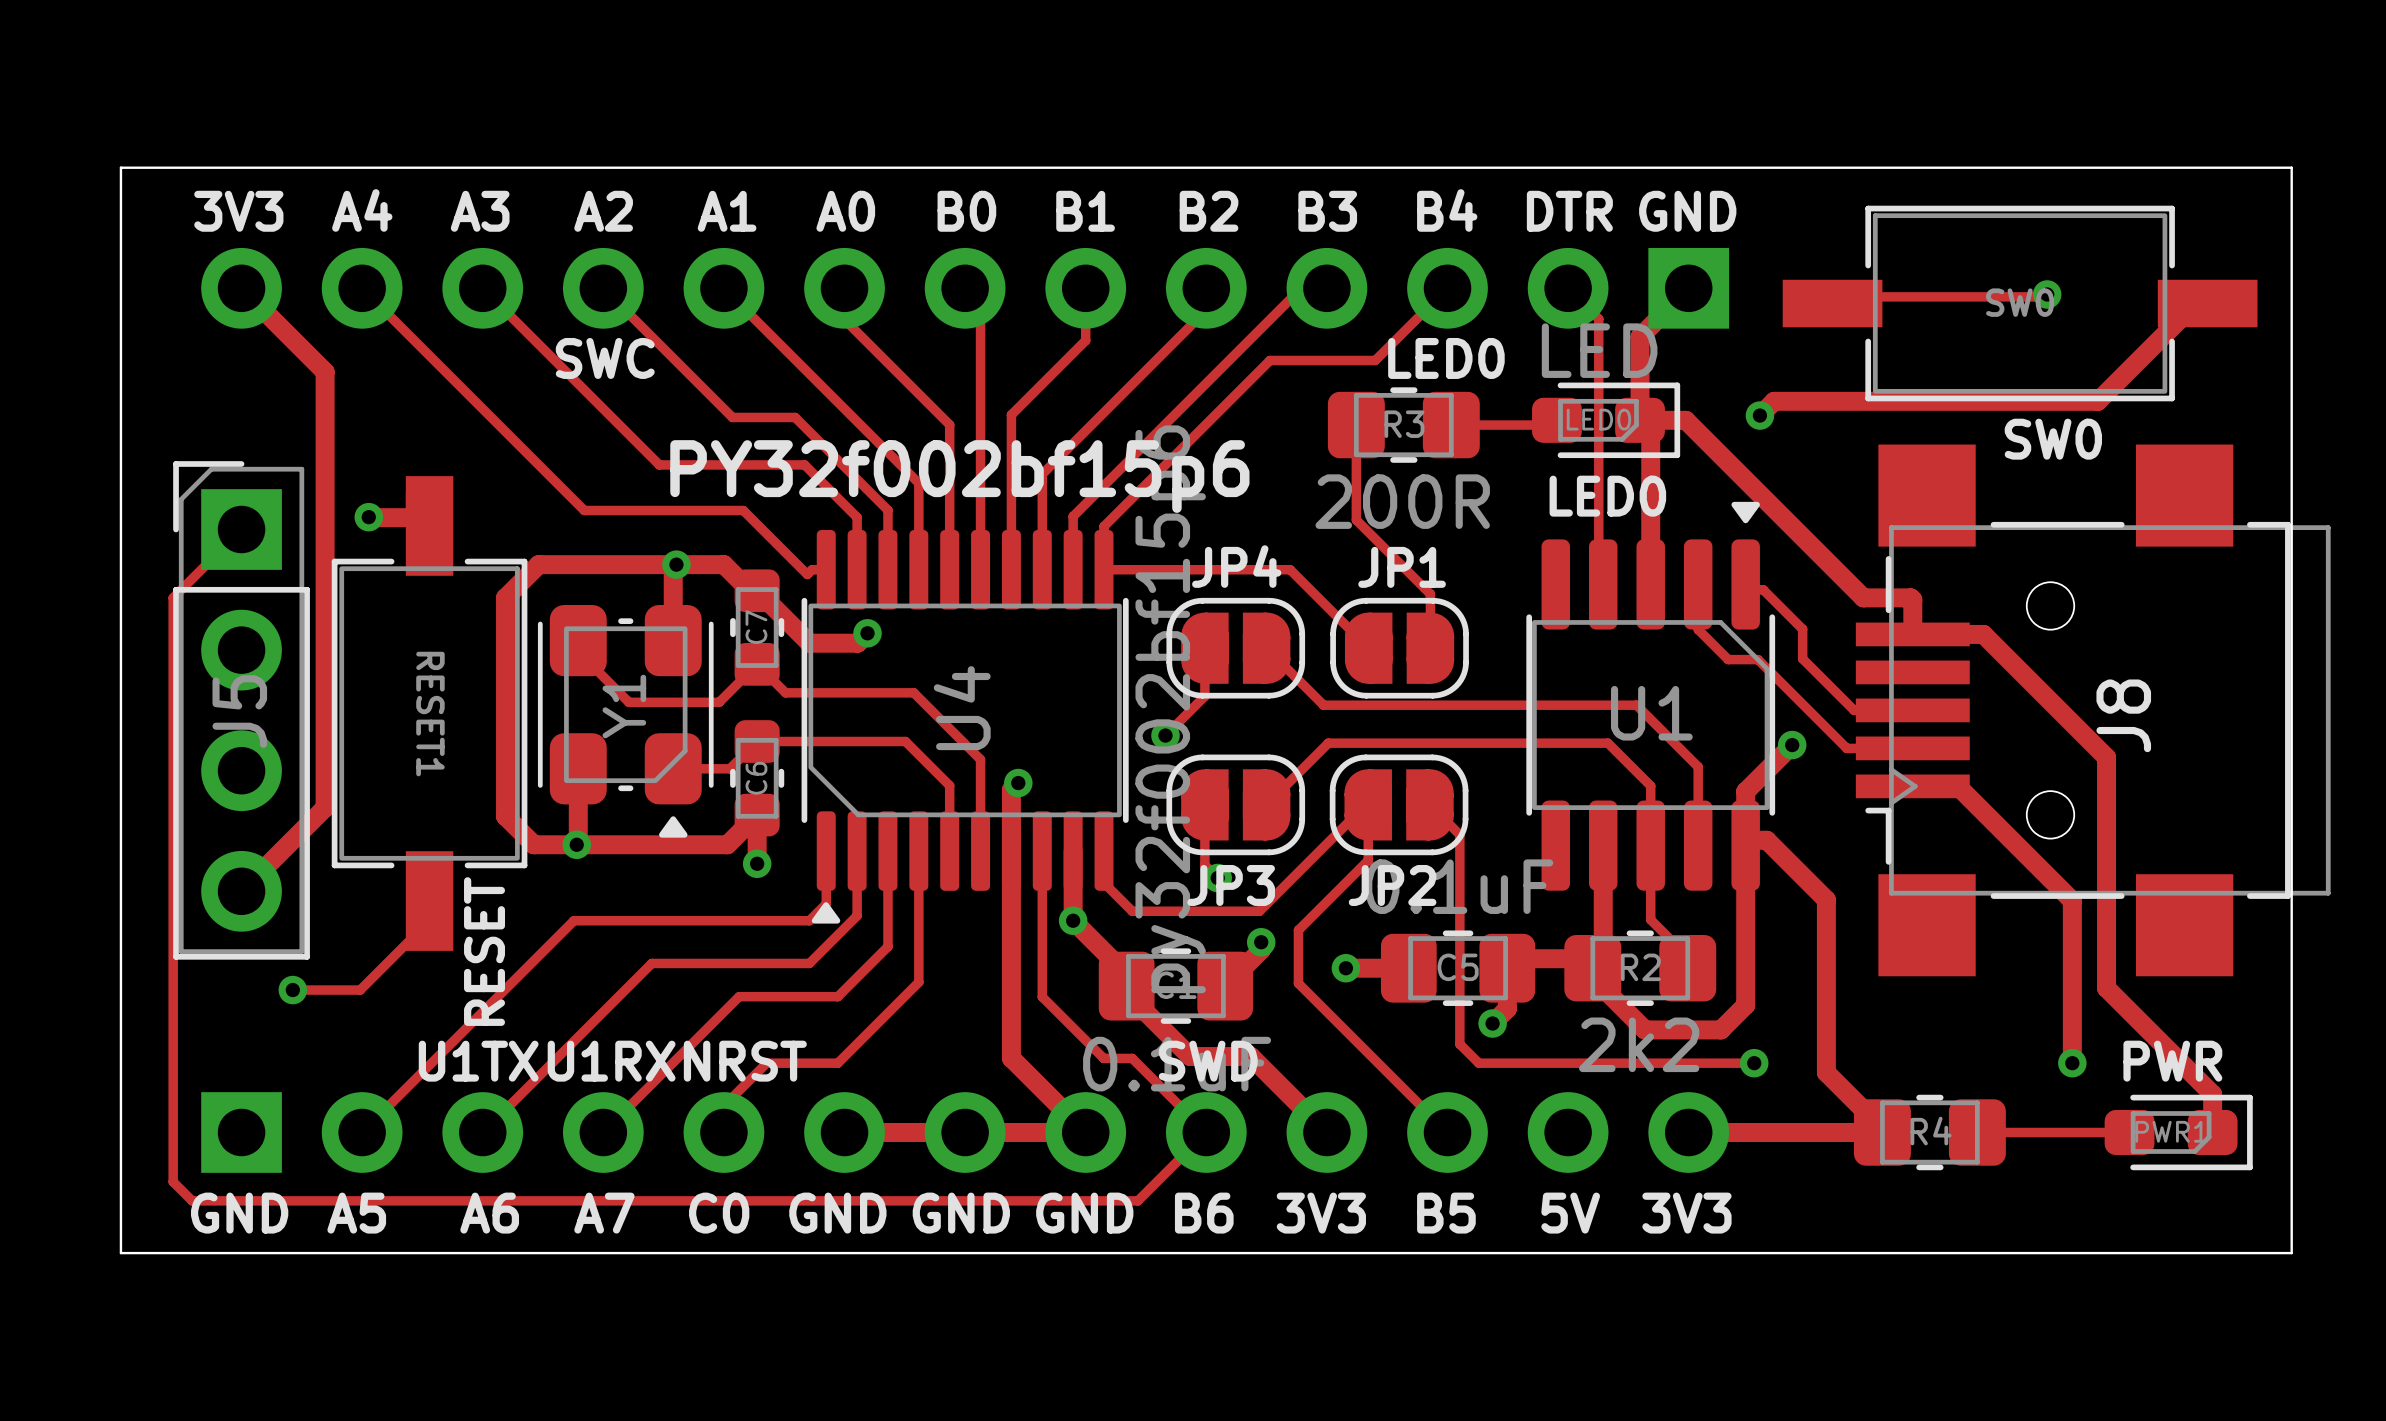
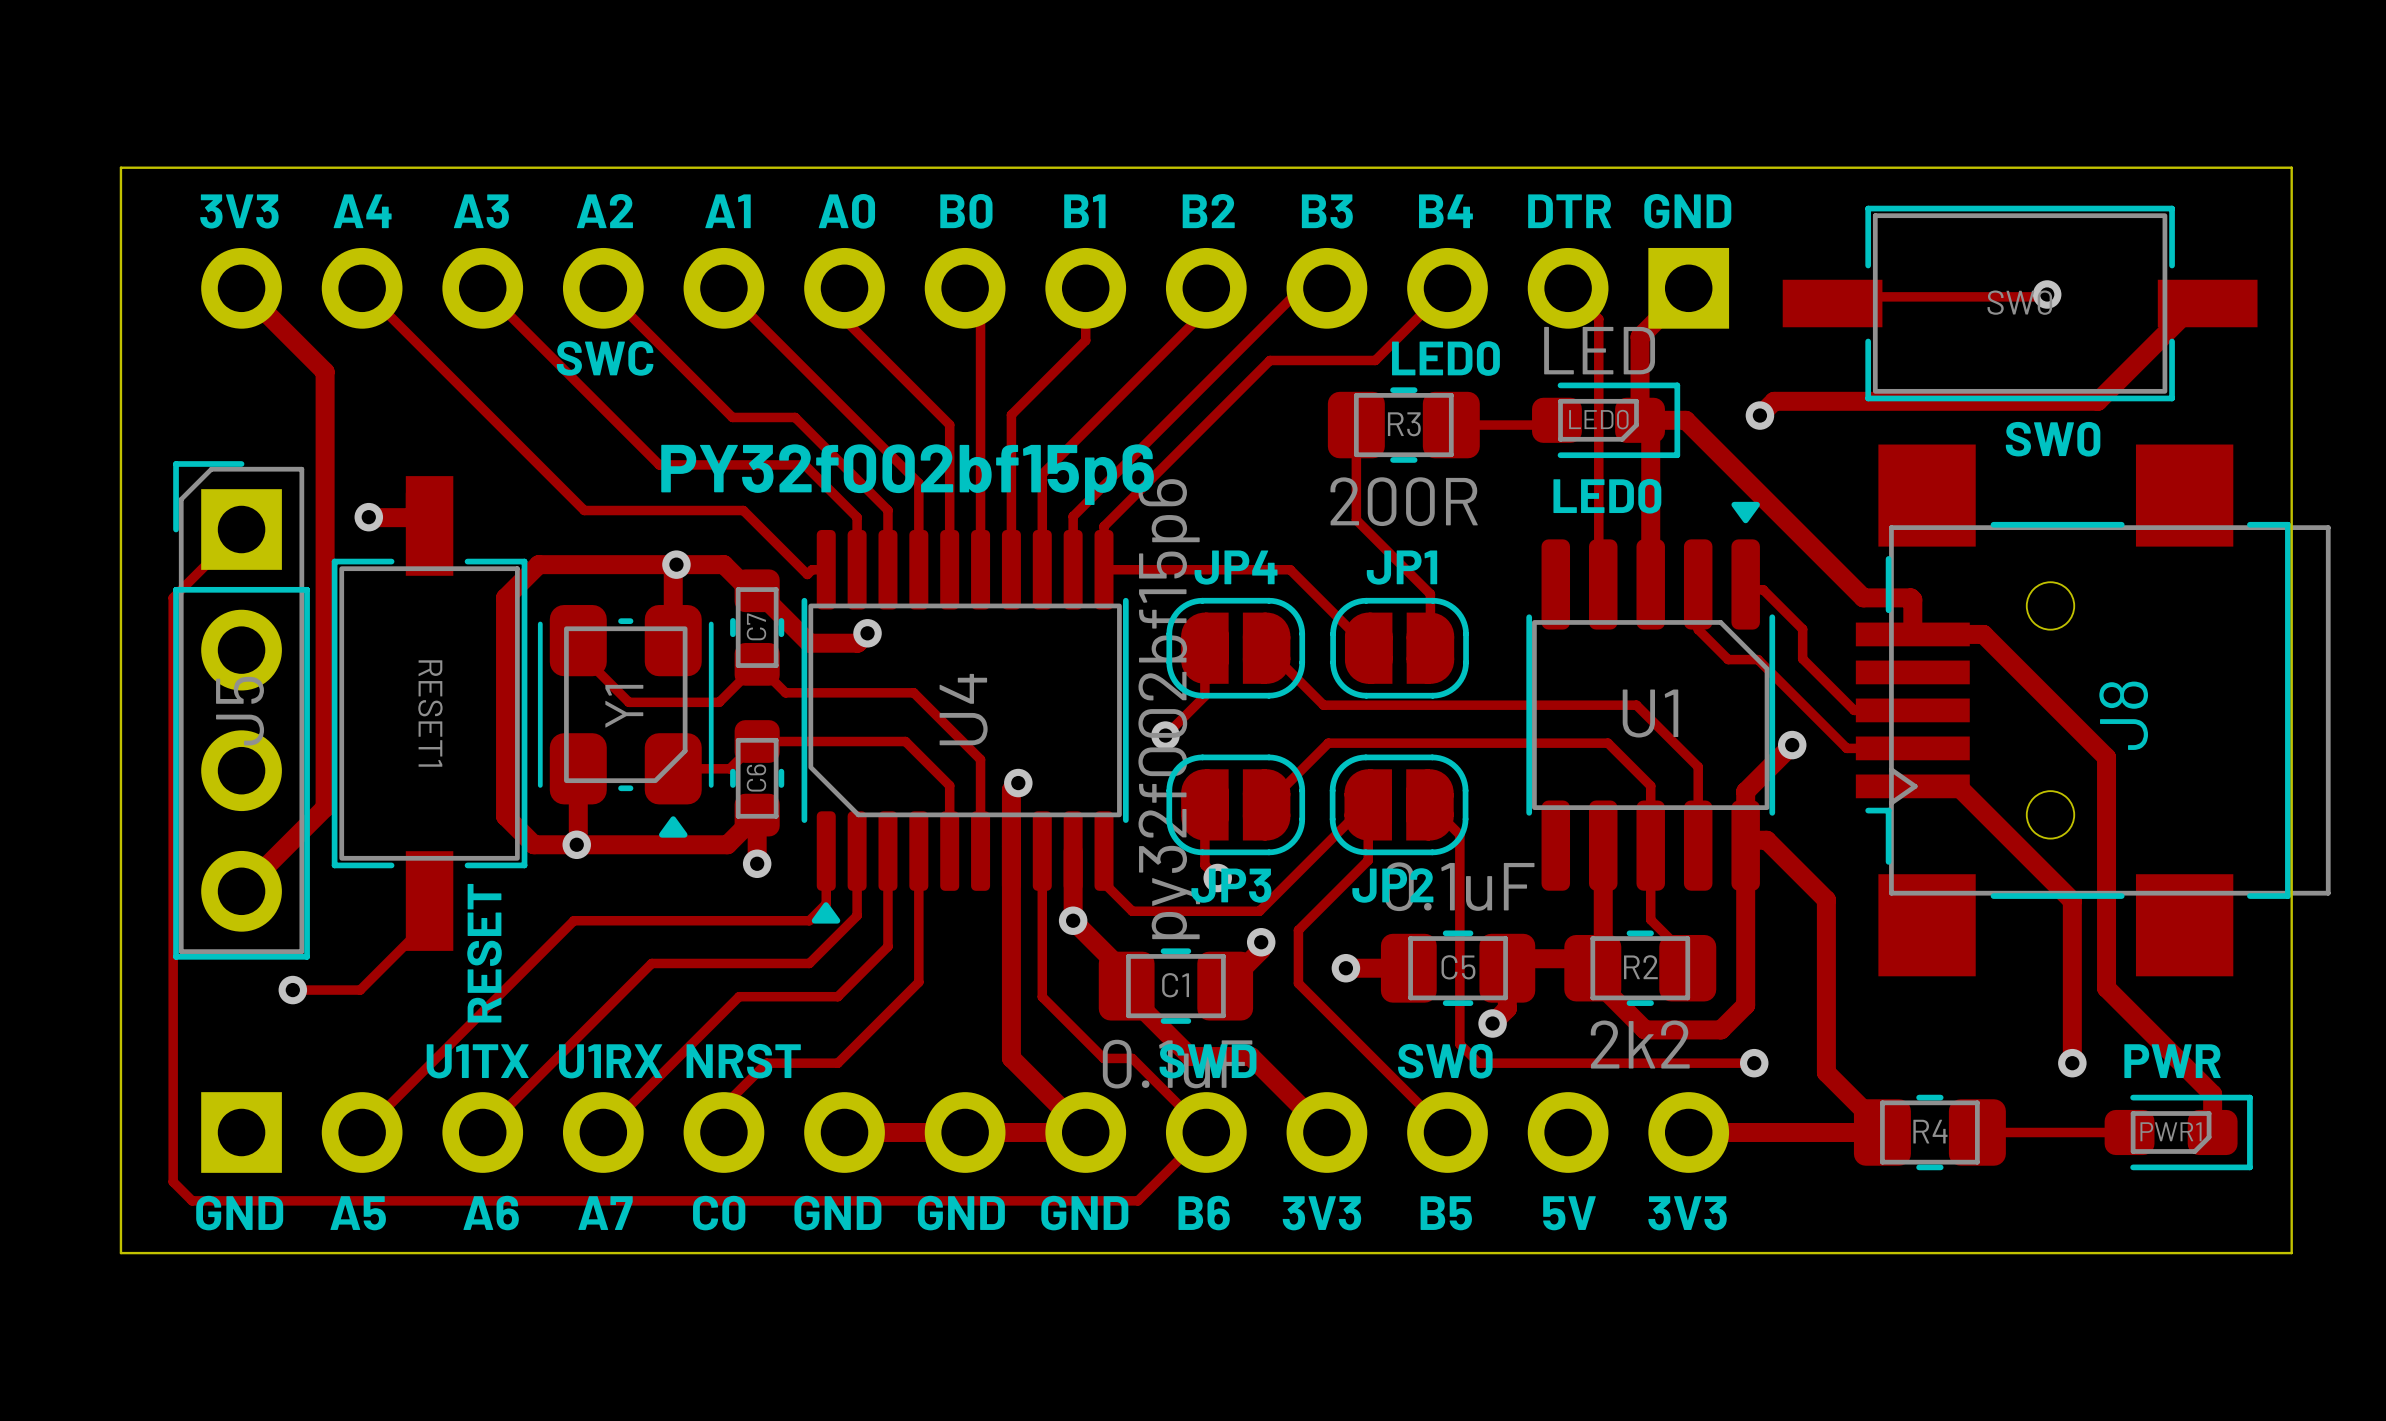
text: none -> SW0 (1445, 1061)

